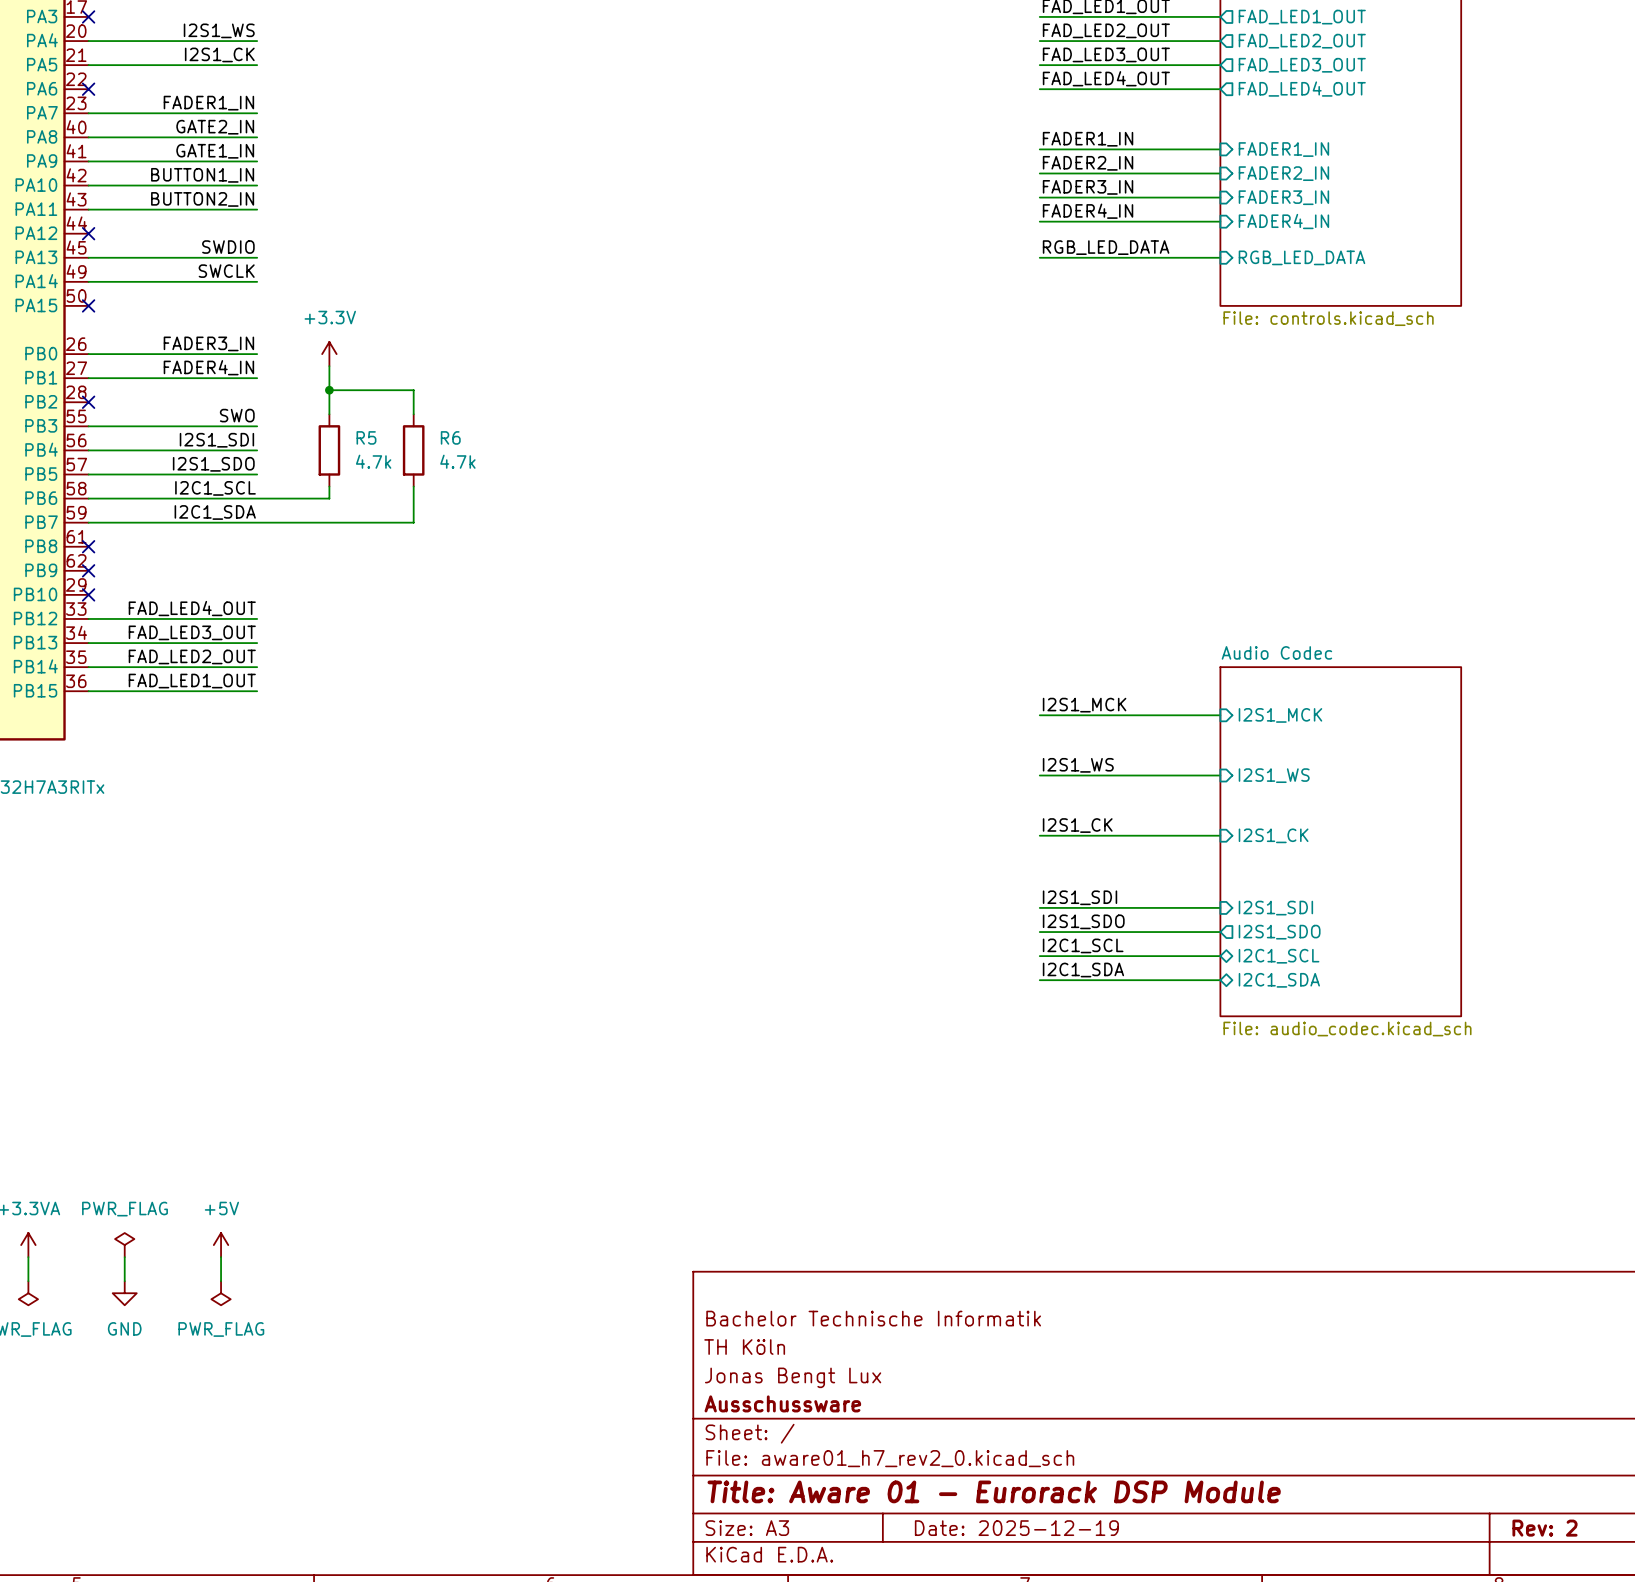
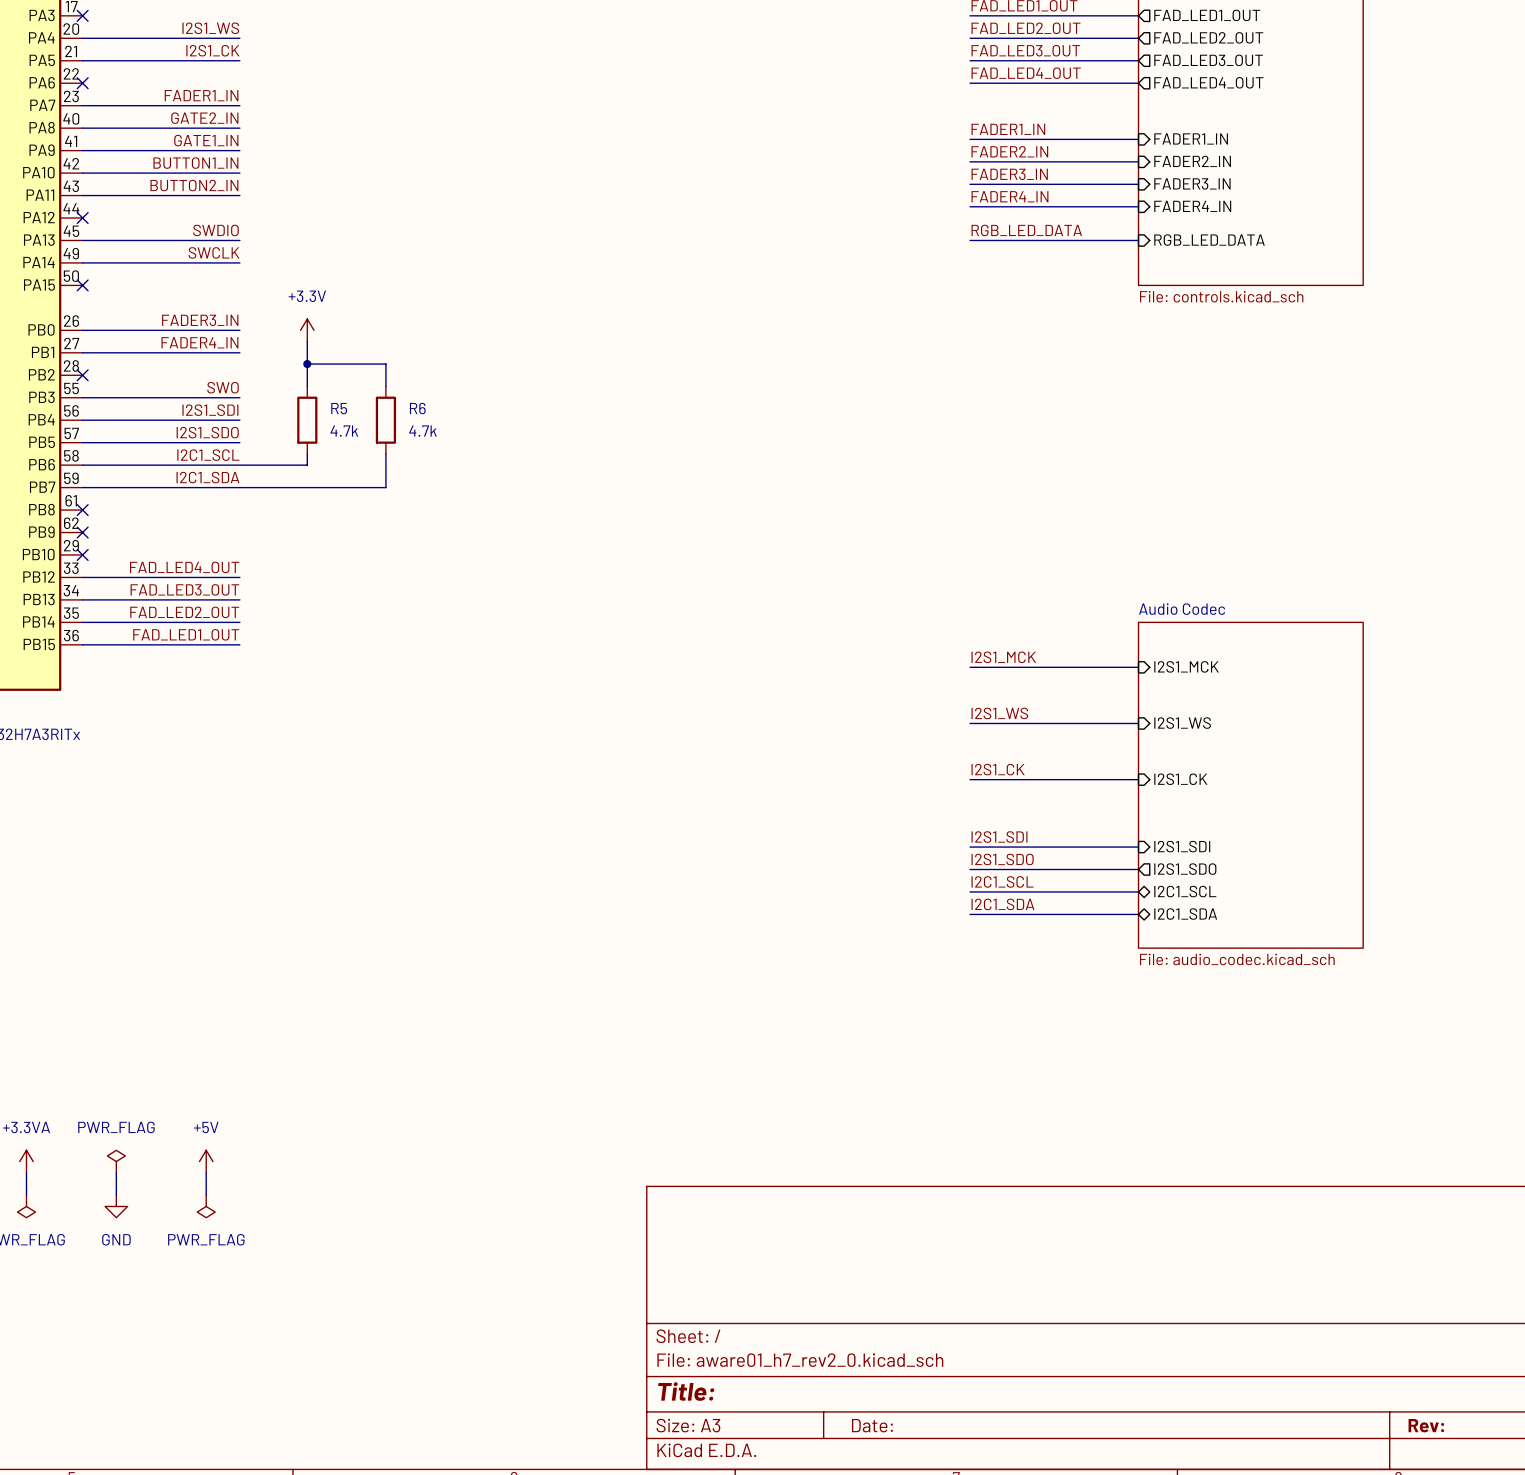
title block: Bachelor Technische Informatik (873, 1318) -> none
title block: TH Köln (744, 1347) -> none
title block: Jonas Bengt Lux (793, 1377) -> none
title block: Ausschussware (782, 1403) -> none
title block: Title: Aware 01 - Eurorack DSP Module (994, 1491) -> Title: (686, 1391)
title block: Date: 2025-12-19 (1016, 1528) -> Date: (872, 1425)
title block: Rev: 2 (1545, 1528) -> Rev: (1426, 1425)

